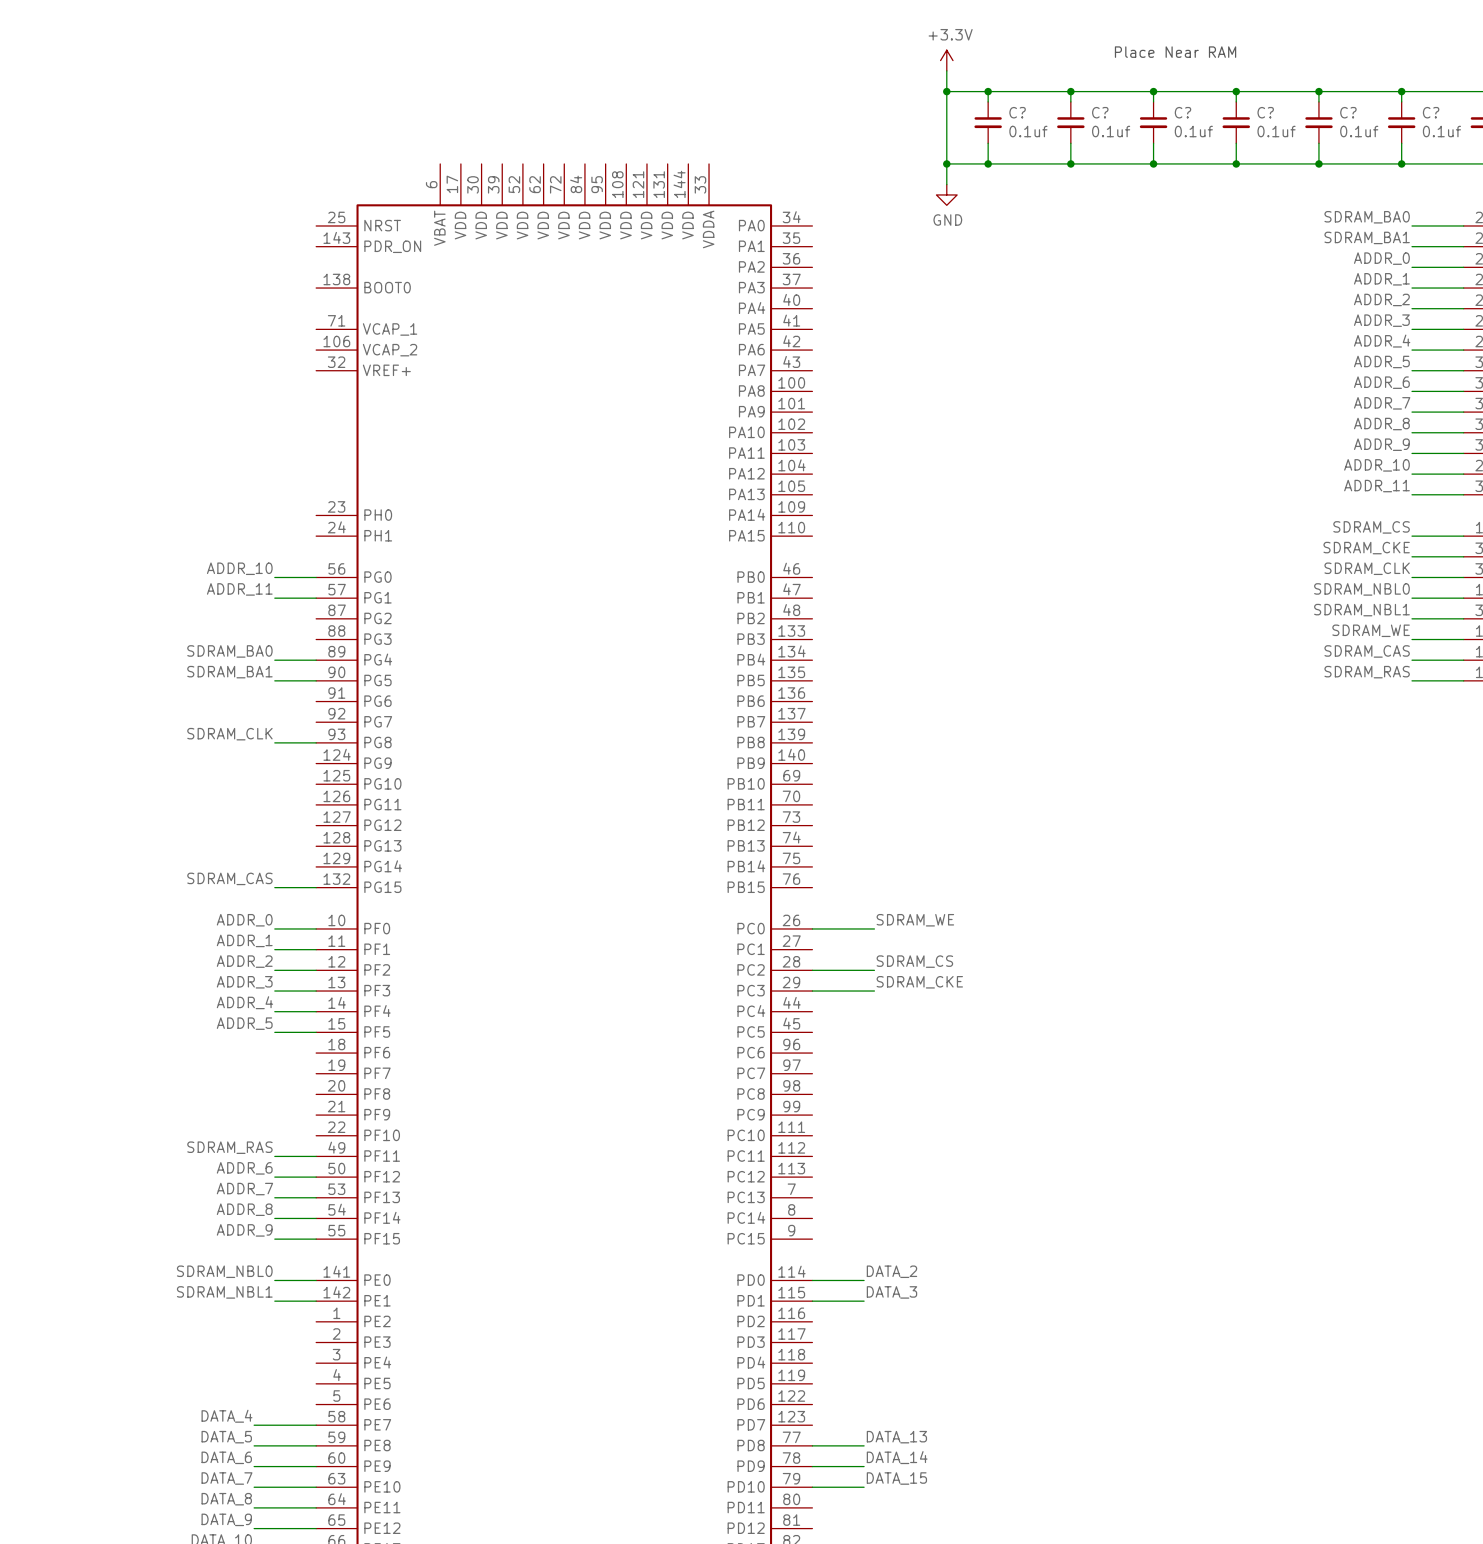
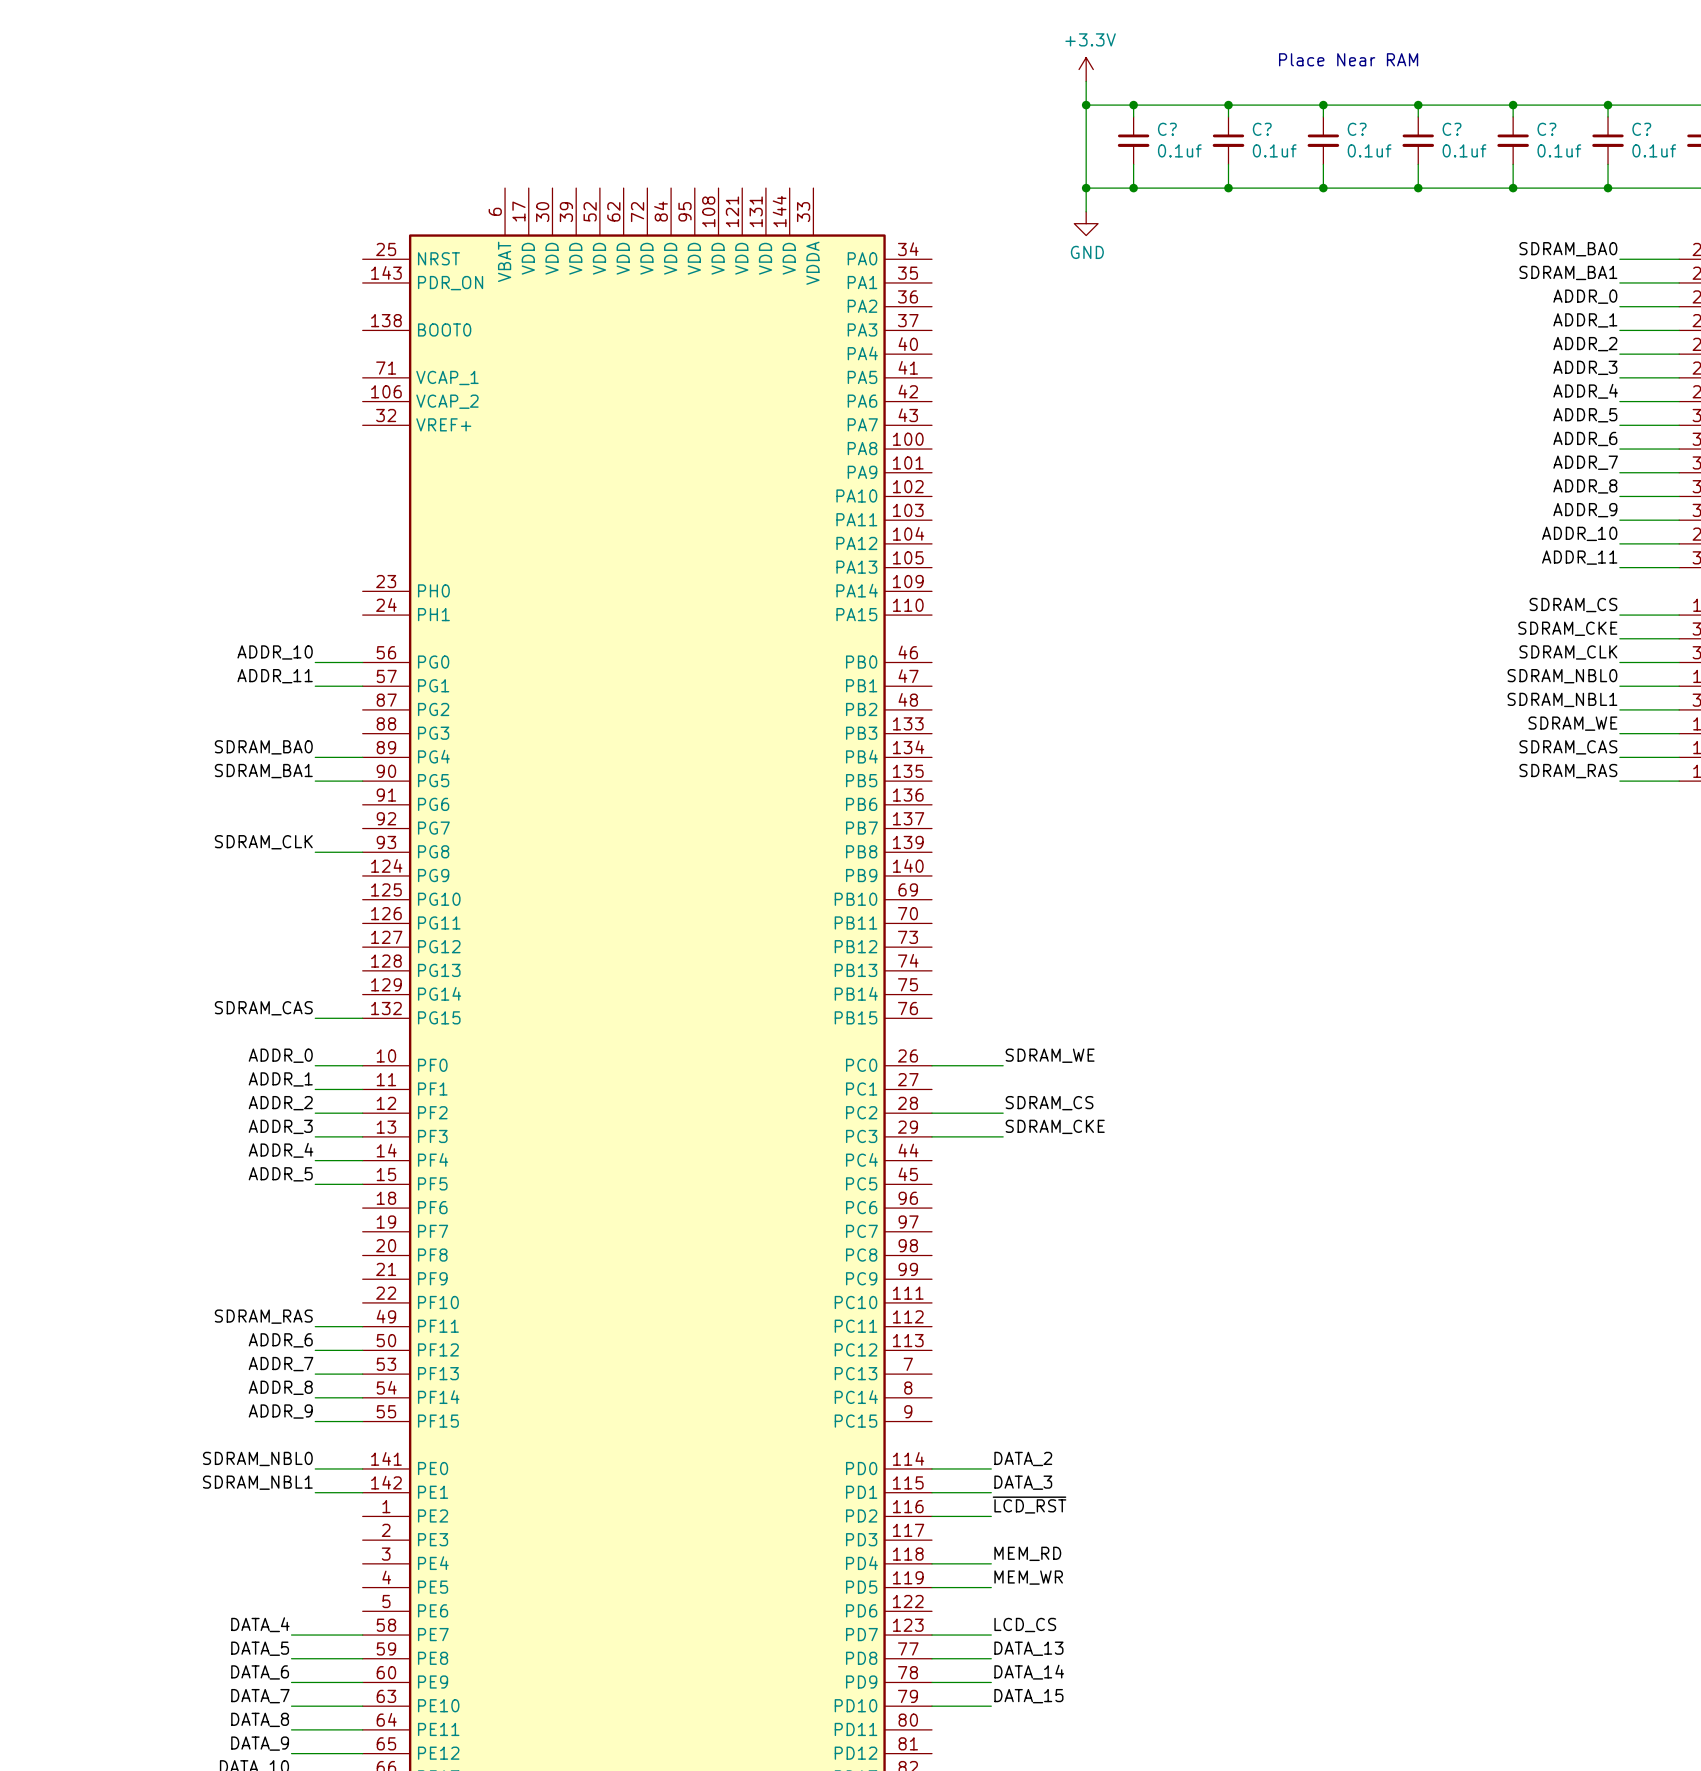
label: none -> ~{LCD_RST} (1029, 1505)
wire: none -> (931, 1516) (991, 1516)
label: none -> MEM_RD (1027, 1553)
wire: none -> (931, 1563) (991, 1563)
label: none -> MEM_WR (1028, 1577)
wire: none -> (931, 1587) (991, 1587)
label: none -> LCD_CS (1025, 1625)
wire: none -> (931, 1635) (991, 1635)

